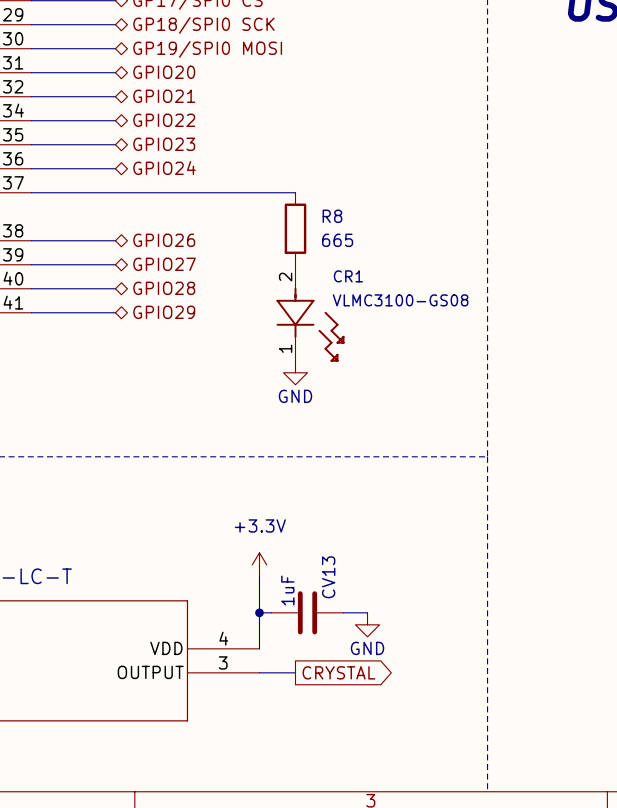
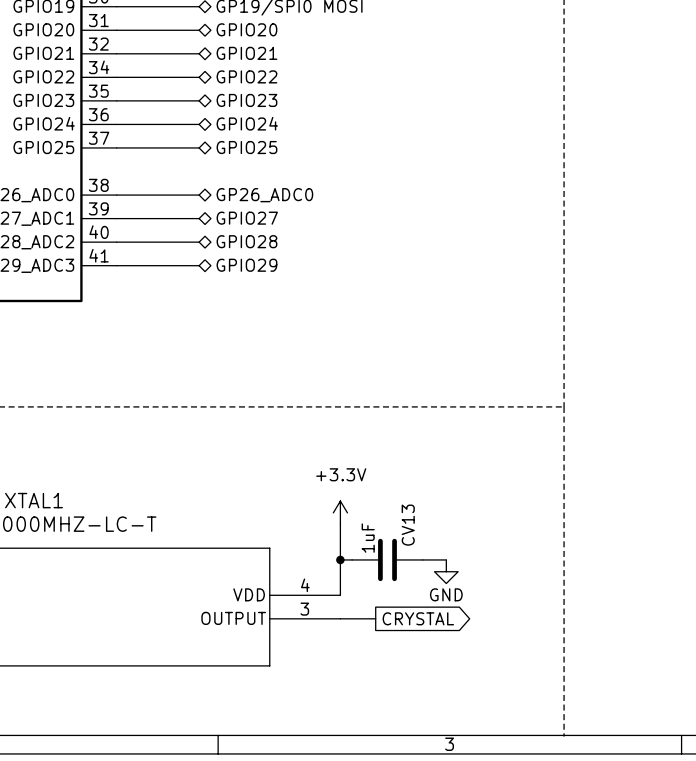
wire: (115, 192) (295, 192) -> none
hierarchical label: none -> GPIO25 (246, 147)
R8: 665 (295, 228) -> none
hierarchical label: GPIO26 (164, 240) -> GP26_ADC0 (264, 195)
CR1: VLMC3100-GS08 (310, 313) -> none
power symbol: GND (295, 372) -> none

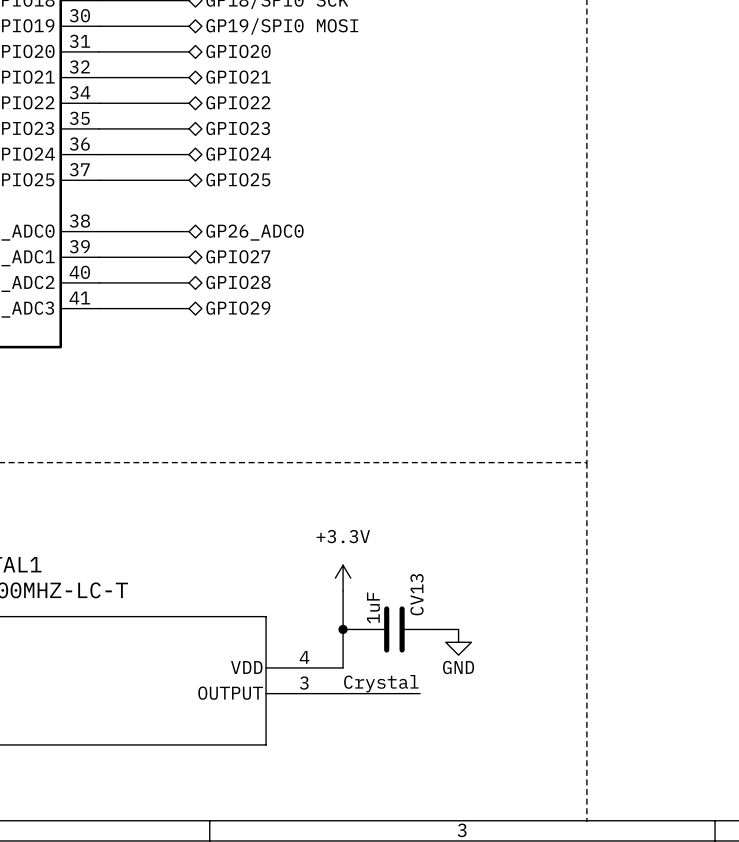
label: none -> Crystal (381, 683)
wire: none -> (381, 693) (420, 693)
global label: CRYSTAL (418, 618) -> none

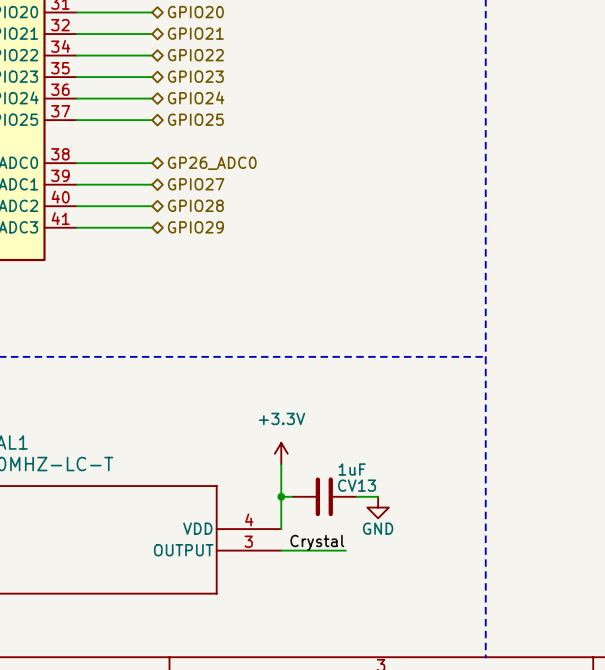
CV13 name rotation: 0° (417, 594) -> 90° clockwise (357, 485)
CV13 value rotation: 0° (373, 607) -> 90° clockwise (352, 469)
CV13 value position: 1uF (373, 607) -> 1uF (352, 469)

